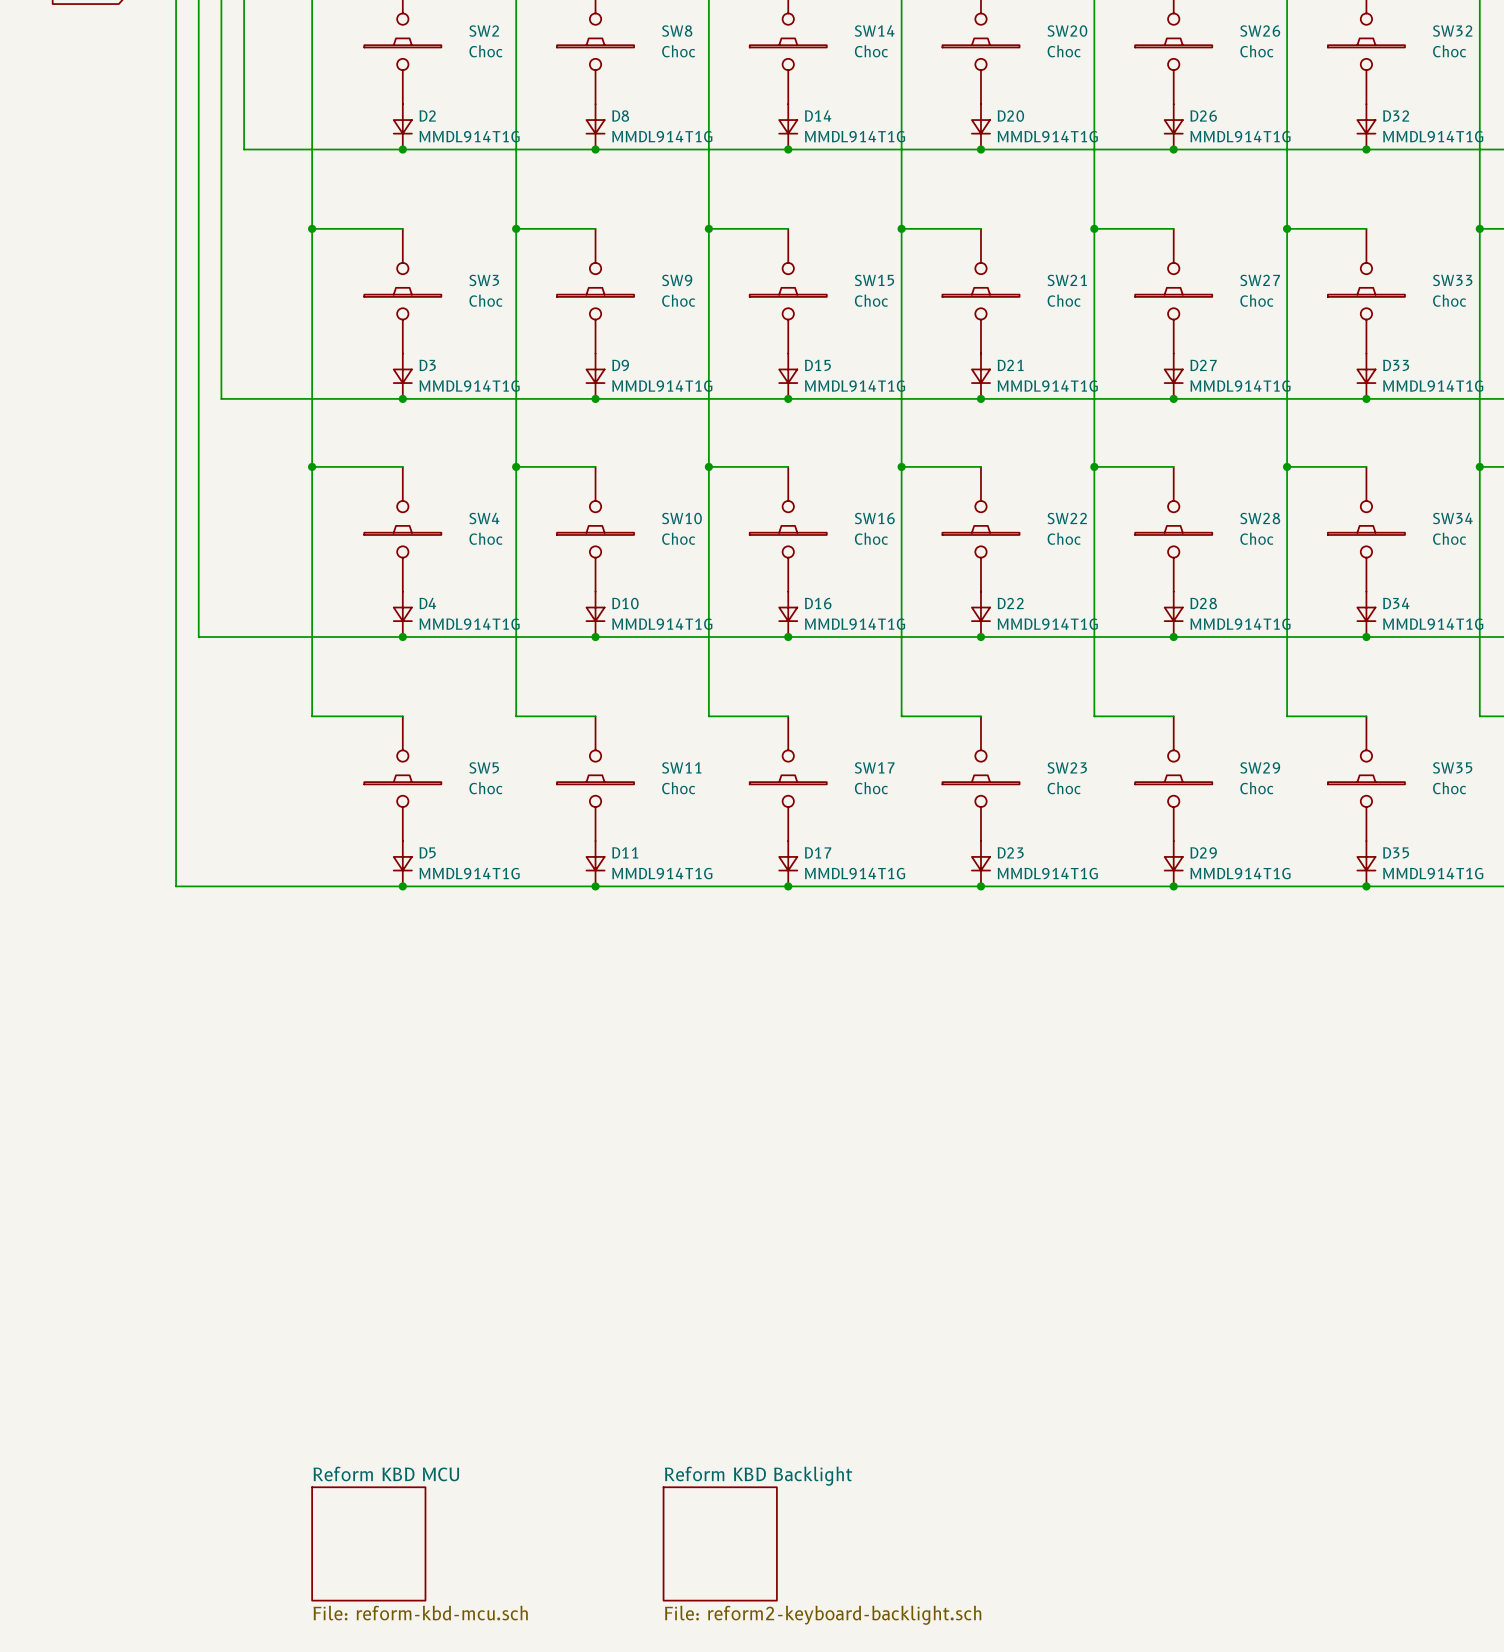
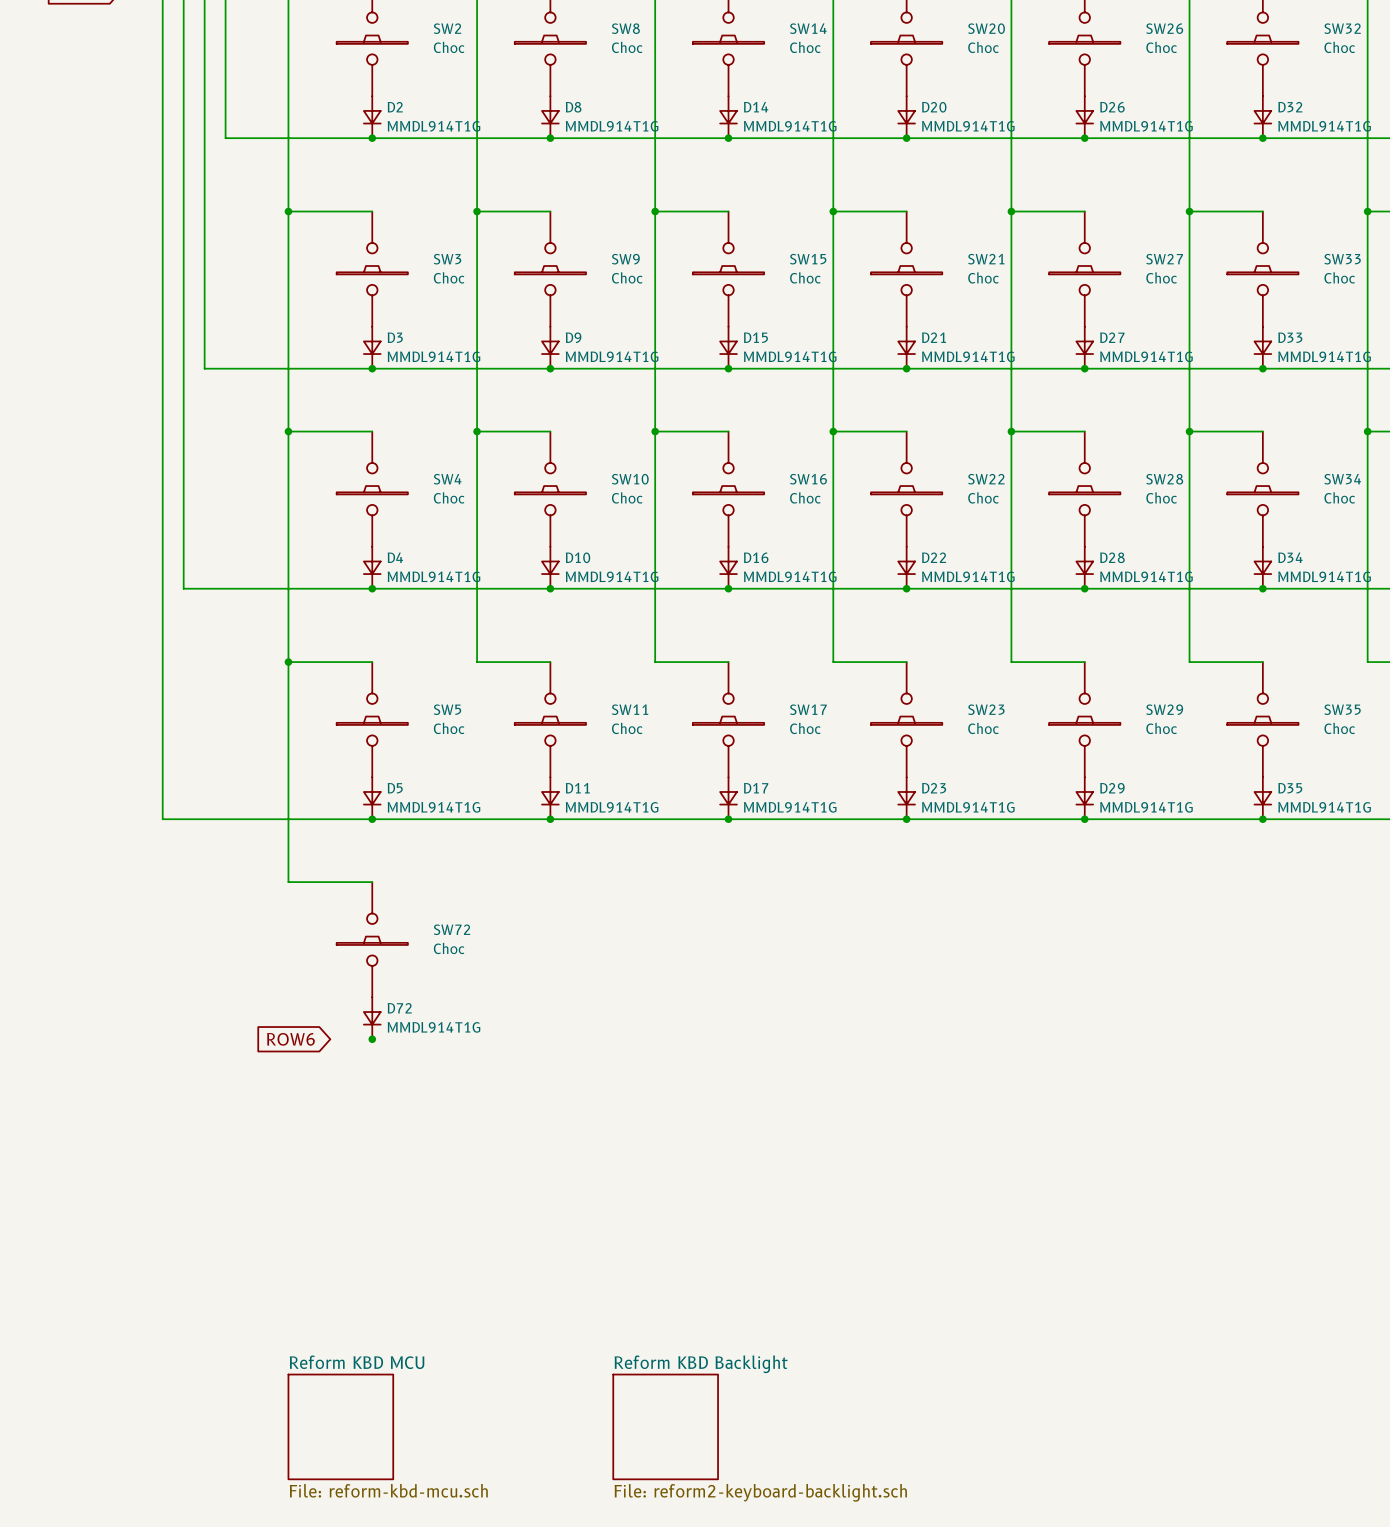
wire: none -> (288, 662) (288, 882) (372, 882)
junction: none -> (288, 662)
SW72: none -> Choc (372, 939)
D72: none -> MMDL914T1G (372, 1018)
global label: none -> ROW6 (290, 1039)
junction: none -> (372, 1039)

